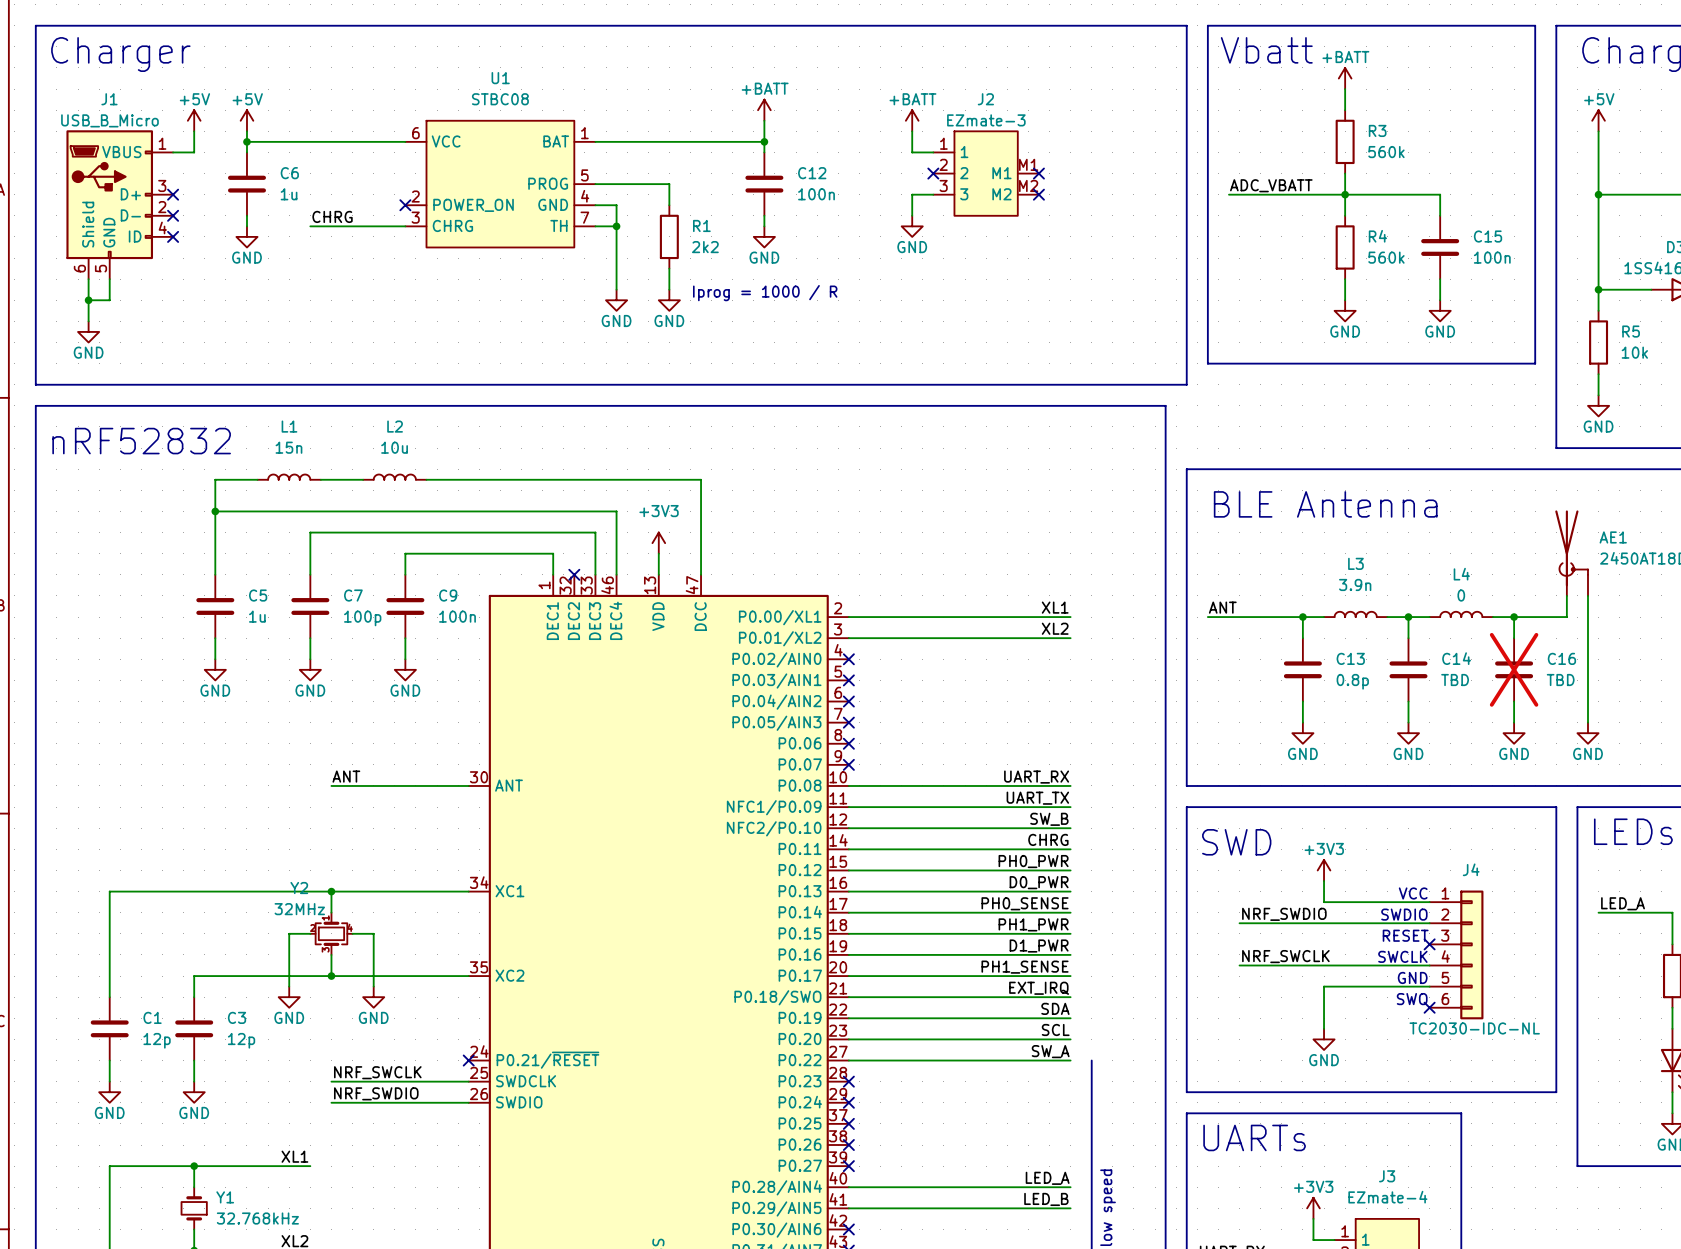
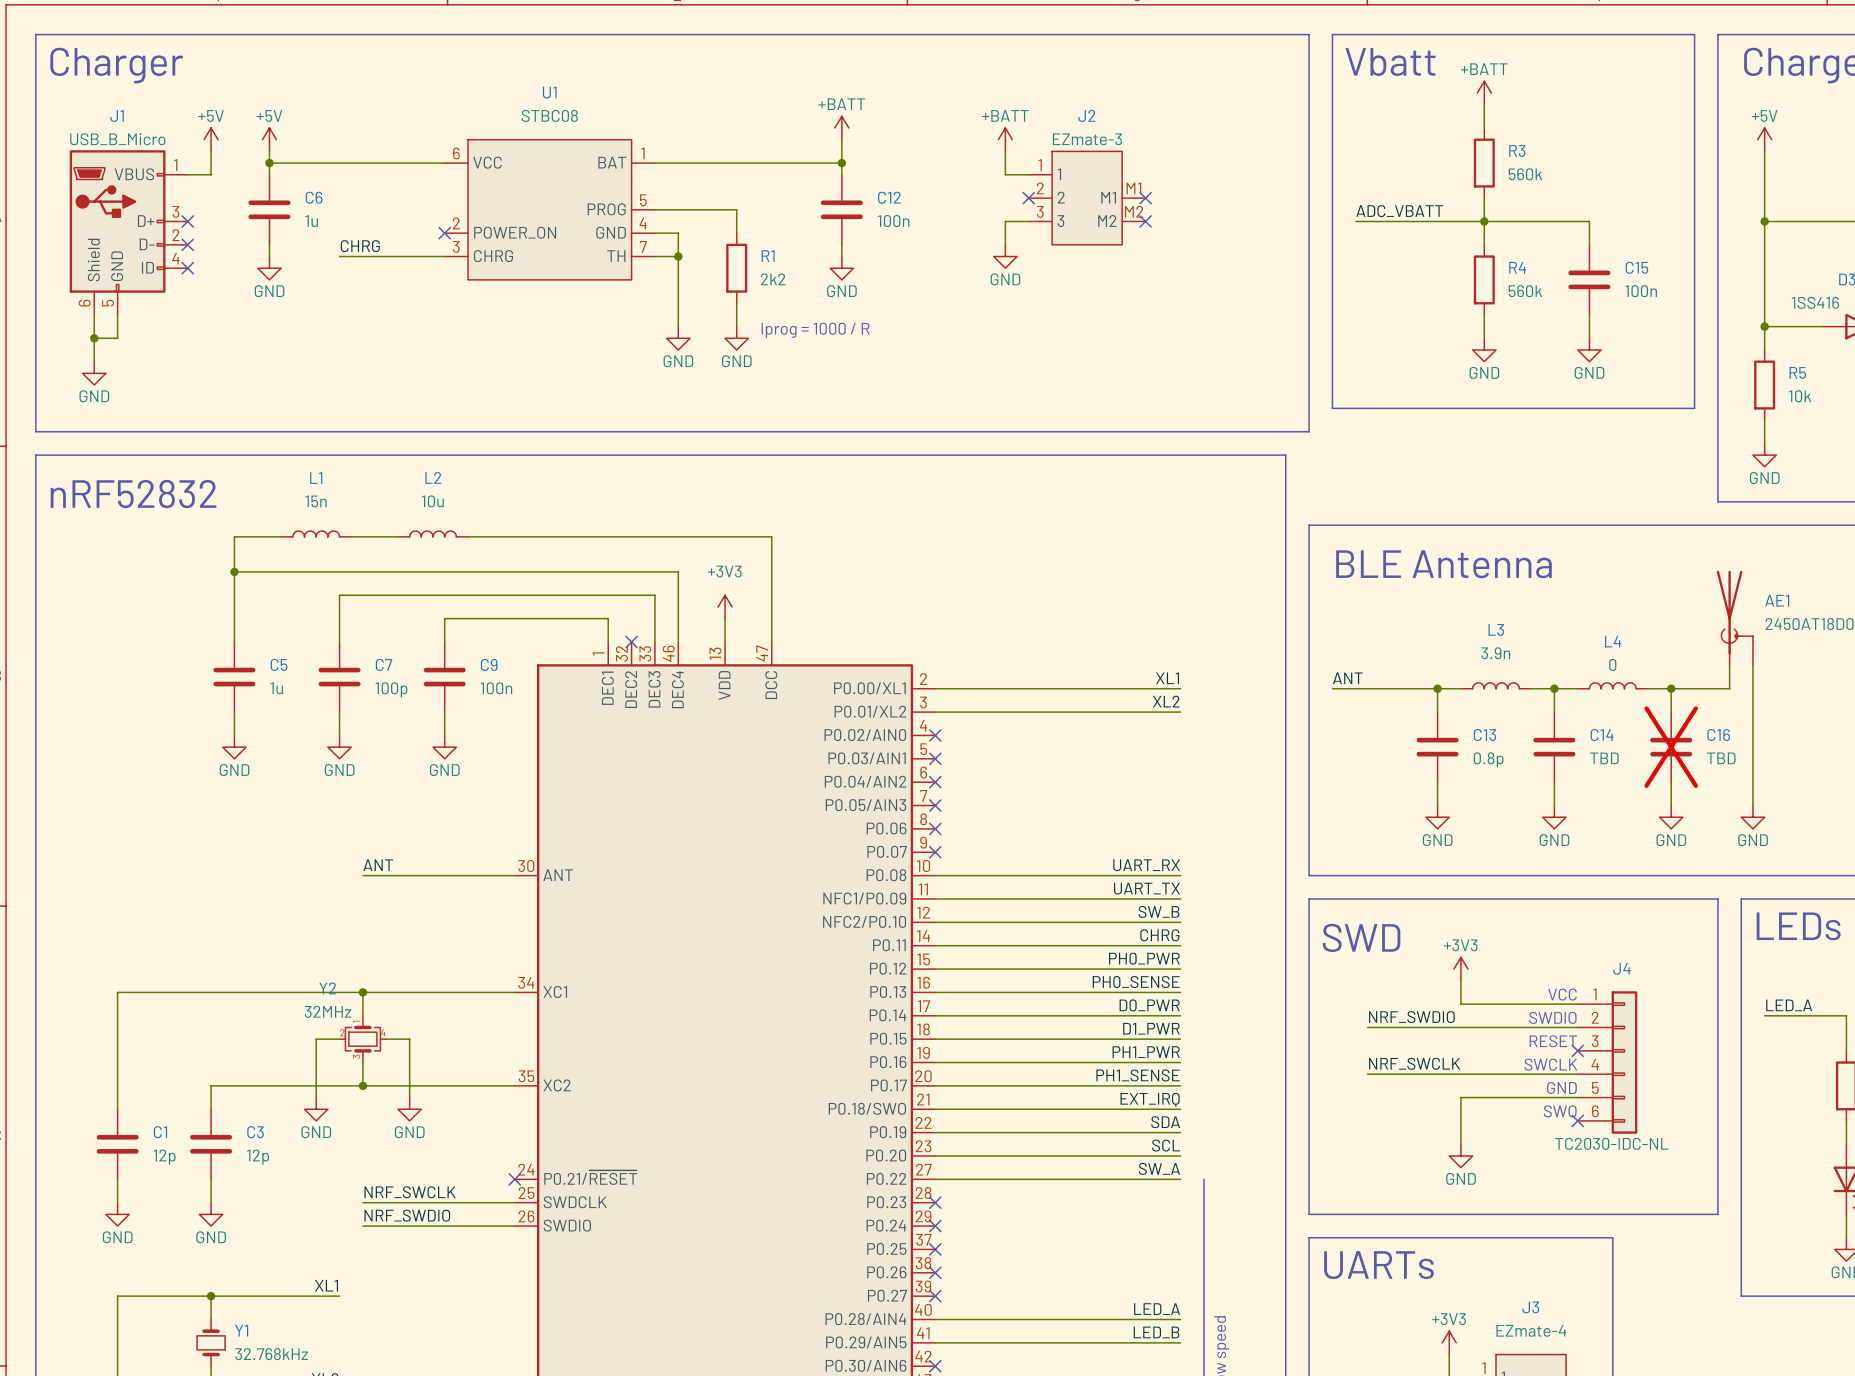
label: D0_PWR (1039, 882) -> PH0_SENSE (1136, 982)
label: PH0_SENSE (1025, 903) -> D0_PWR (1149, 1005)
label: PH1_PWR (1033, 924) -> D1_PWR (1151, 1028)
label: D1_PWR (1039, 946) -> PH1_PWR (1146, 1052)

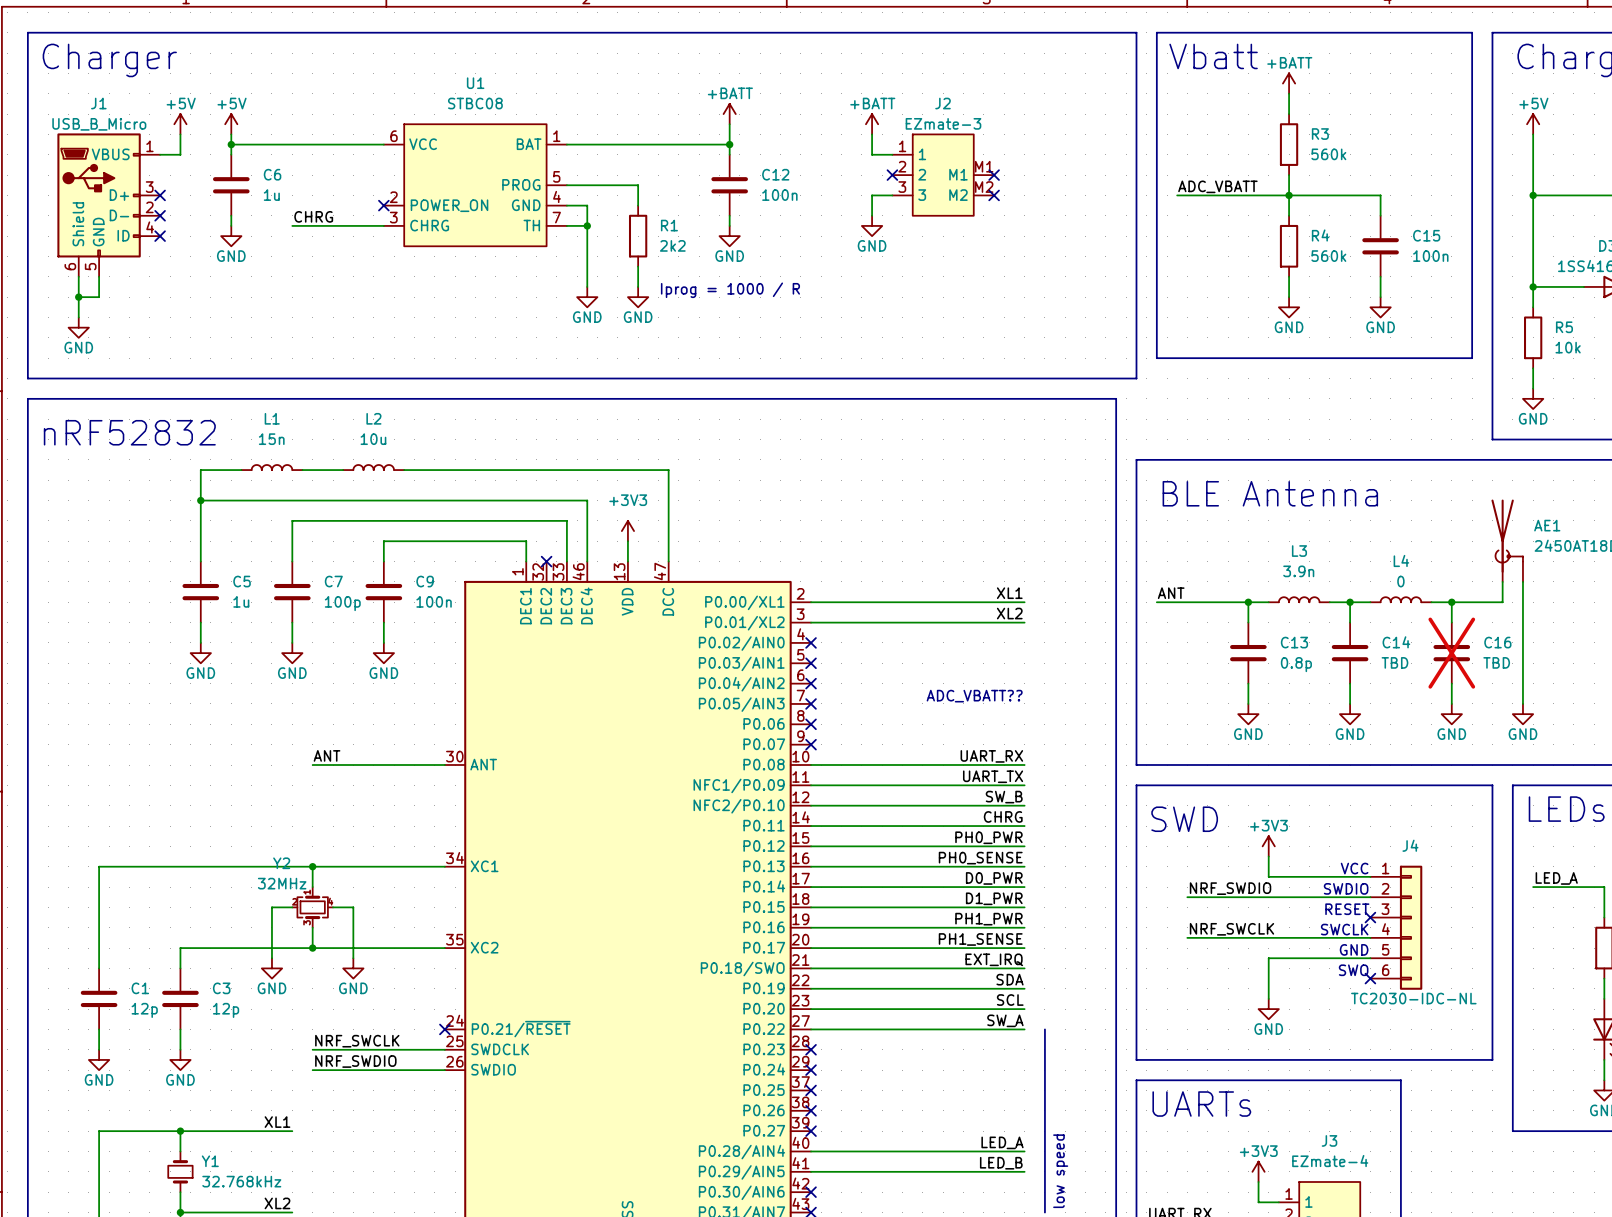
text: none -> ADC_VBATT?? (974, 696)

